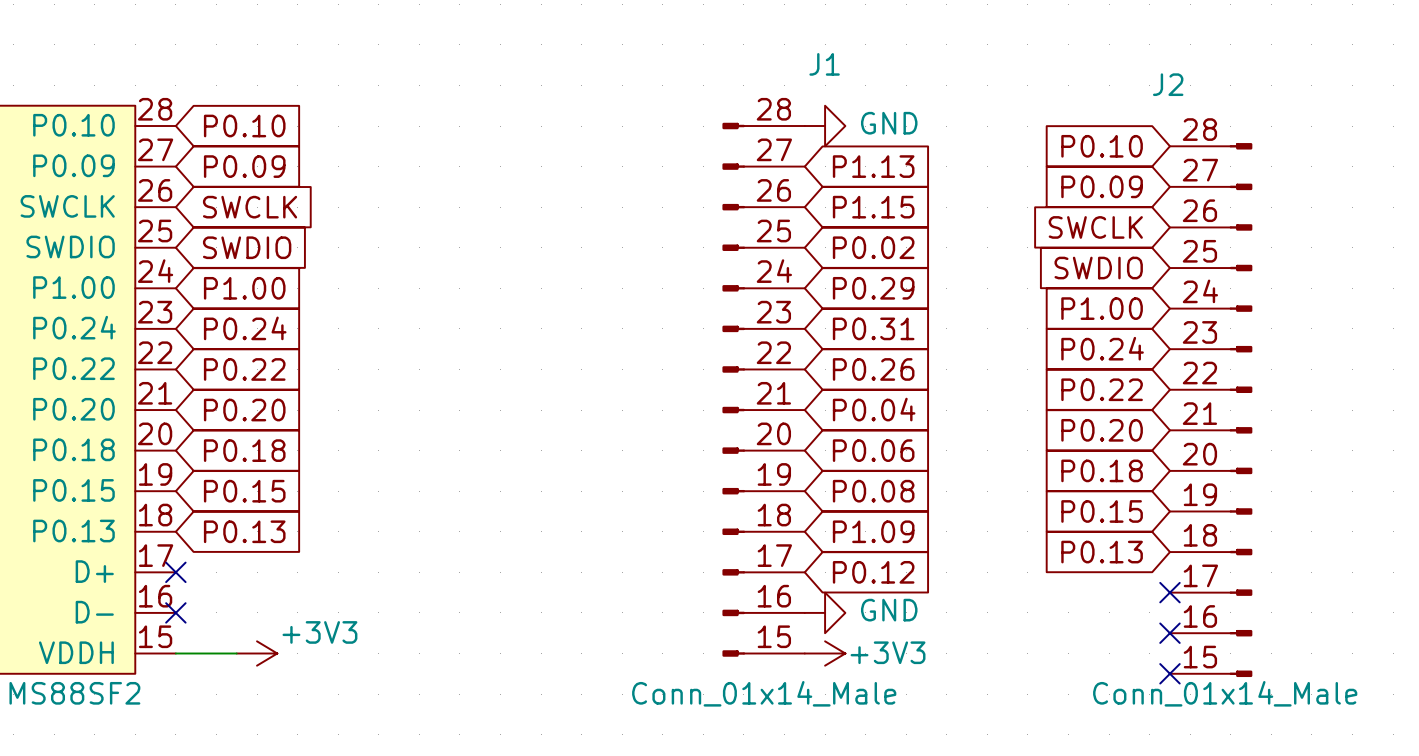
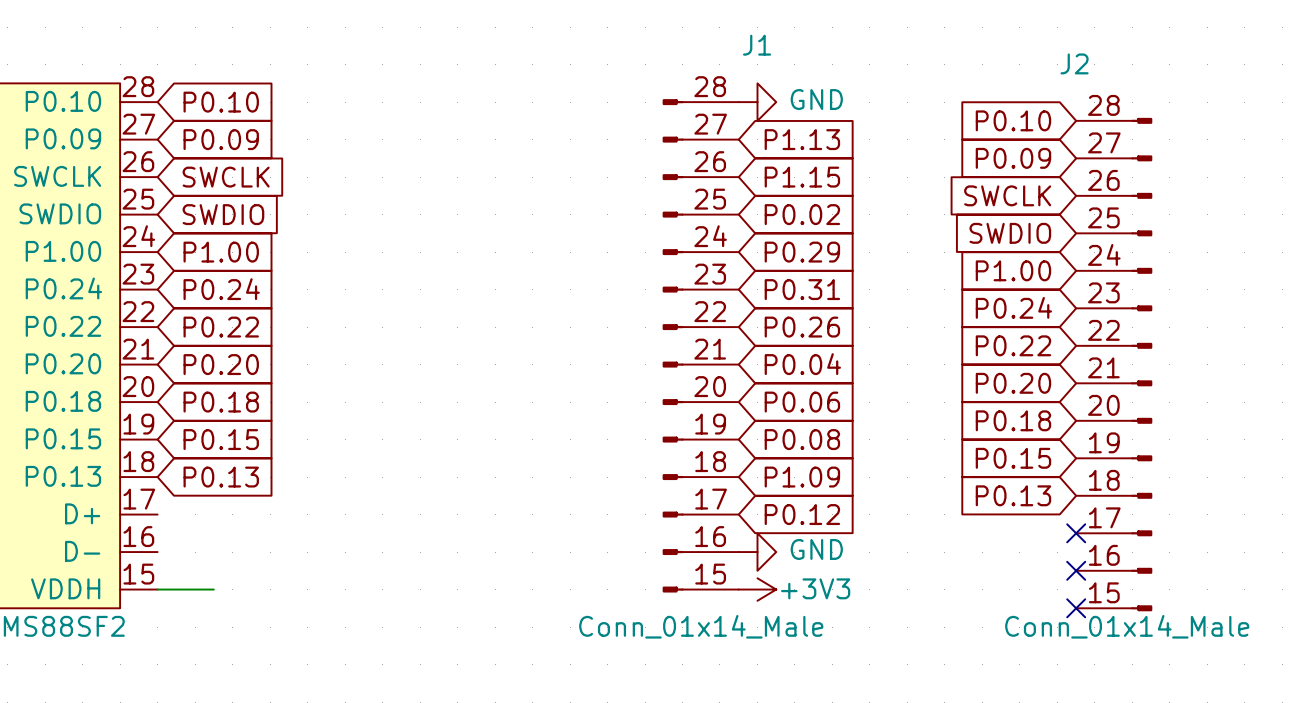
no-connect mark: (175, 572) -> none
no-connect mark: (175, 612) -> none
power symbol: +3V3 (257, 653) -> none

